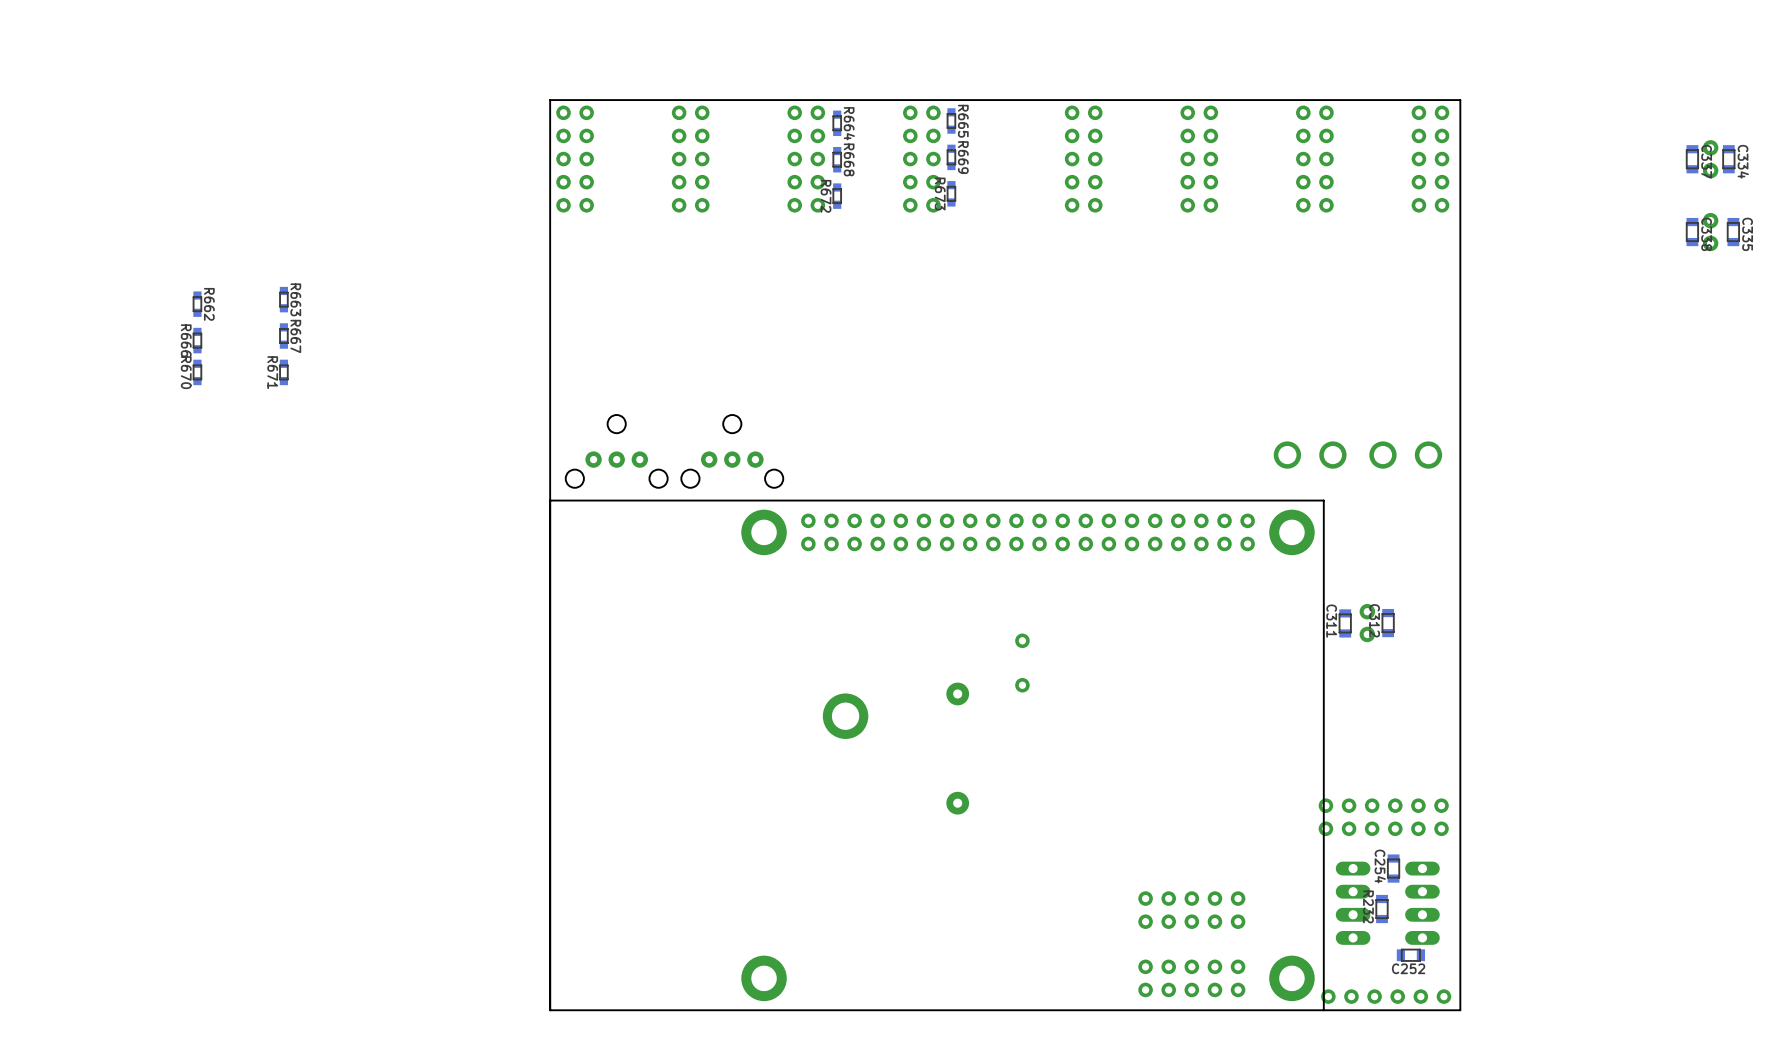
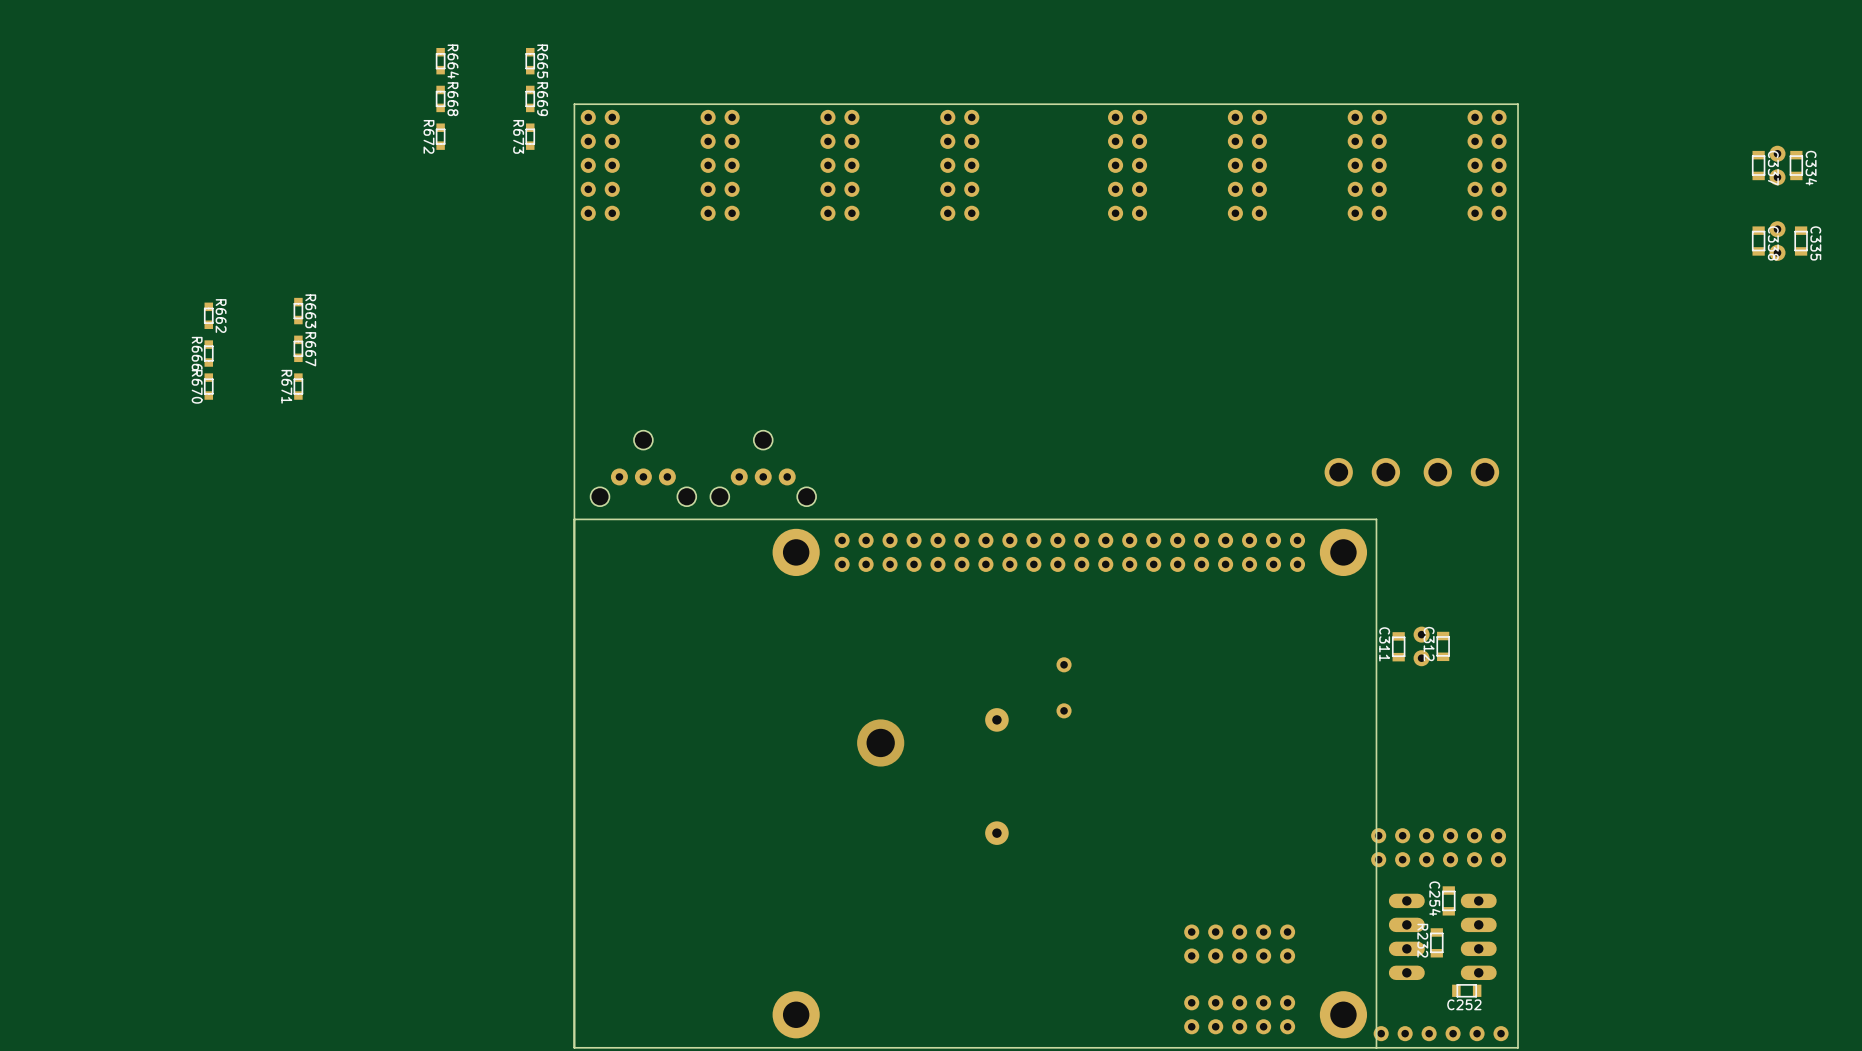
R665 position: (951, 120) -> (530, 61)
R664 position: (837, 123) -> (440, 61)
R669 position: (951, 157) -> (530, 98)
R668 position: (837, 159) -> (440, 98)
R673 position: (951, 193) -> (530, 136)
R672 position: (837, 196) -> (440, 136)

